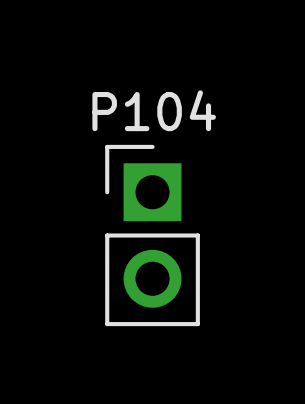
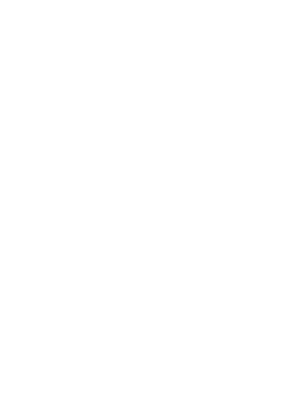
P104: (152, 235) -> none

